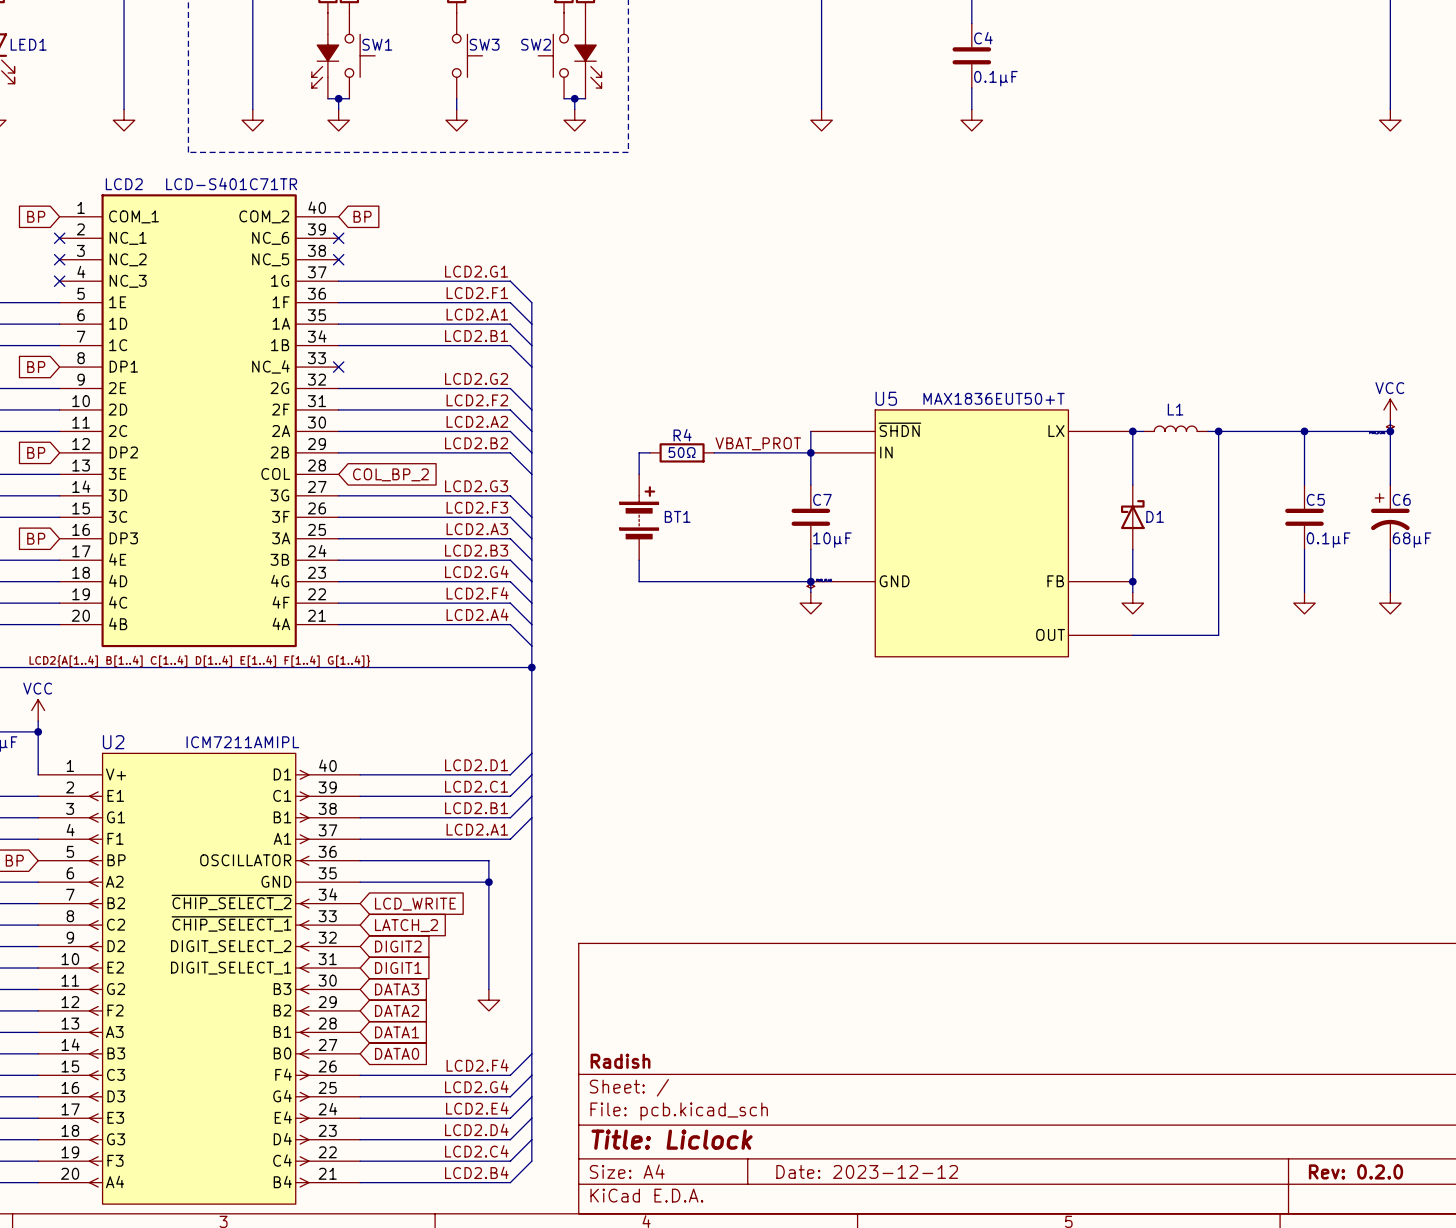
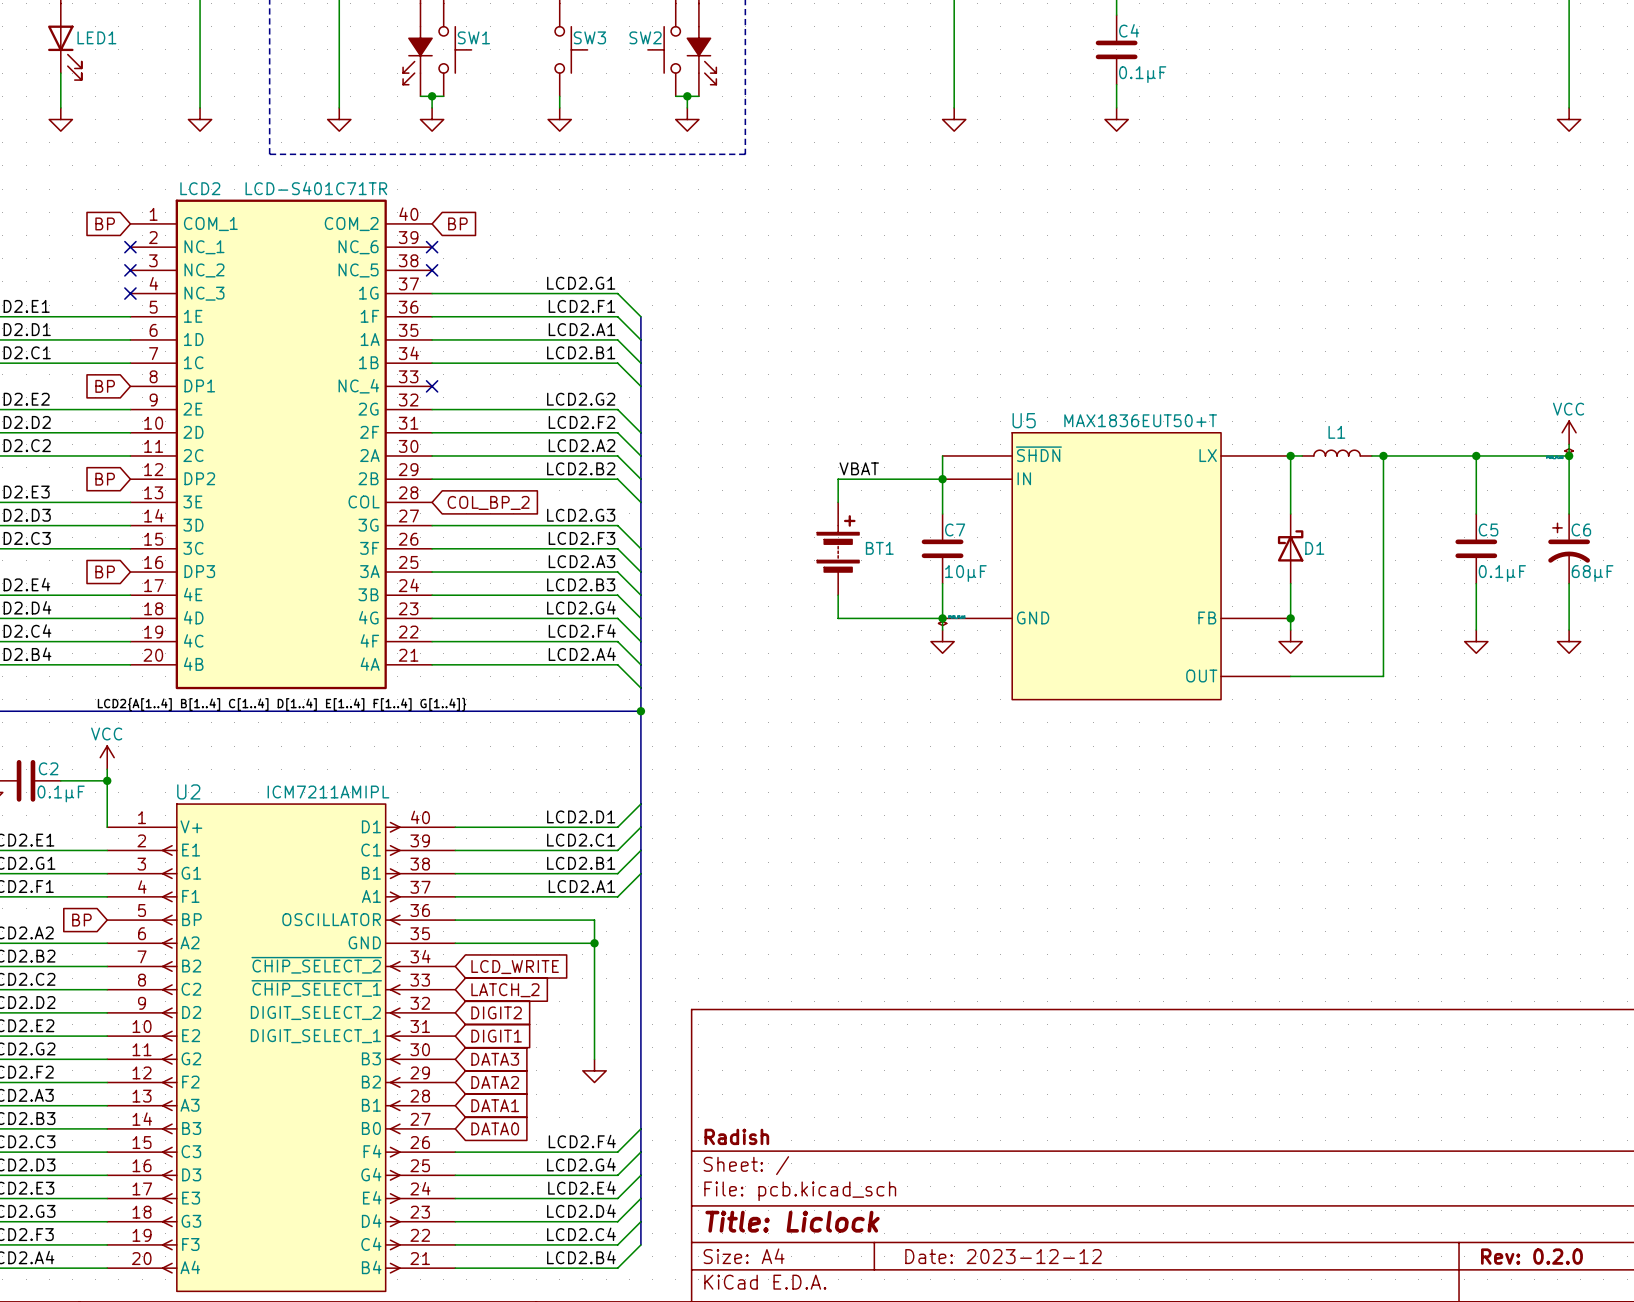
label: VBAT_PROT (758, 443) -> VBAT (859, 468)
wire: (649, 452) (639, 452) (639, 474) -> none
R4: 50Ω (682, 452) -> none
wire: none -> (838, 479) (838, 502)
BT1 position: (639, 517) -> (838, 548)
wire: (639, 560) (639, 581) (714, 581) -> (838, 595) (838, 618)

